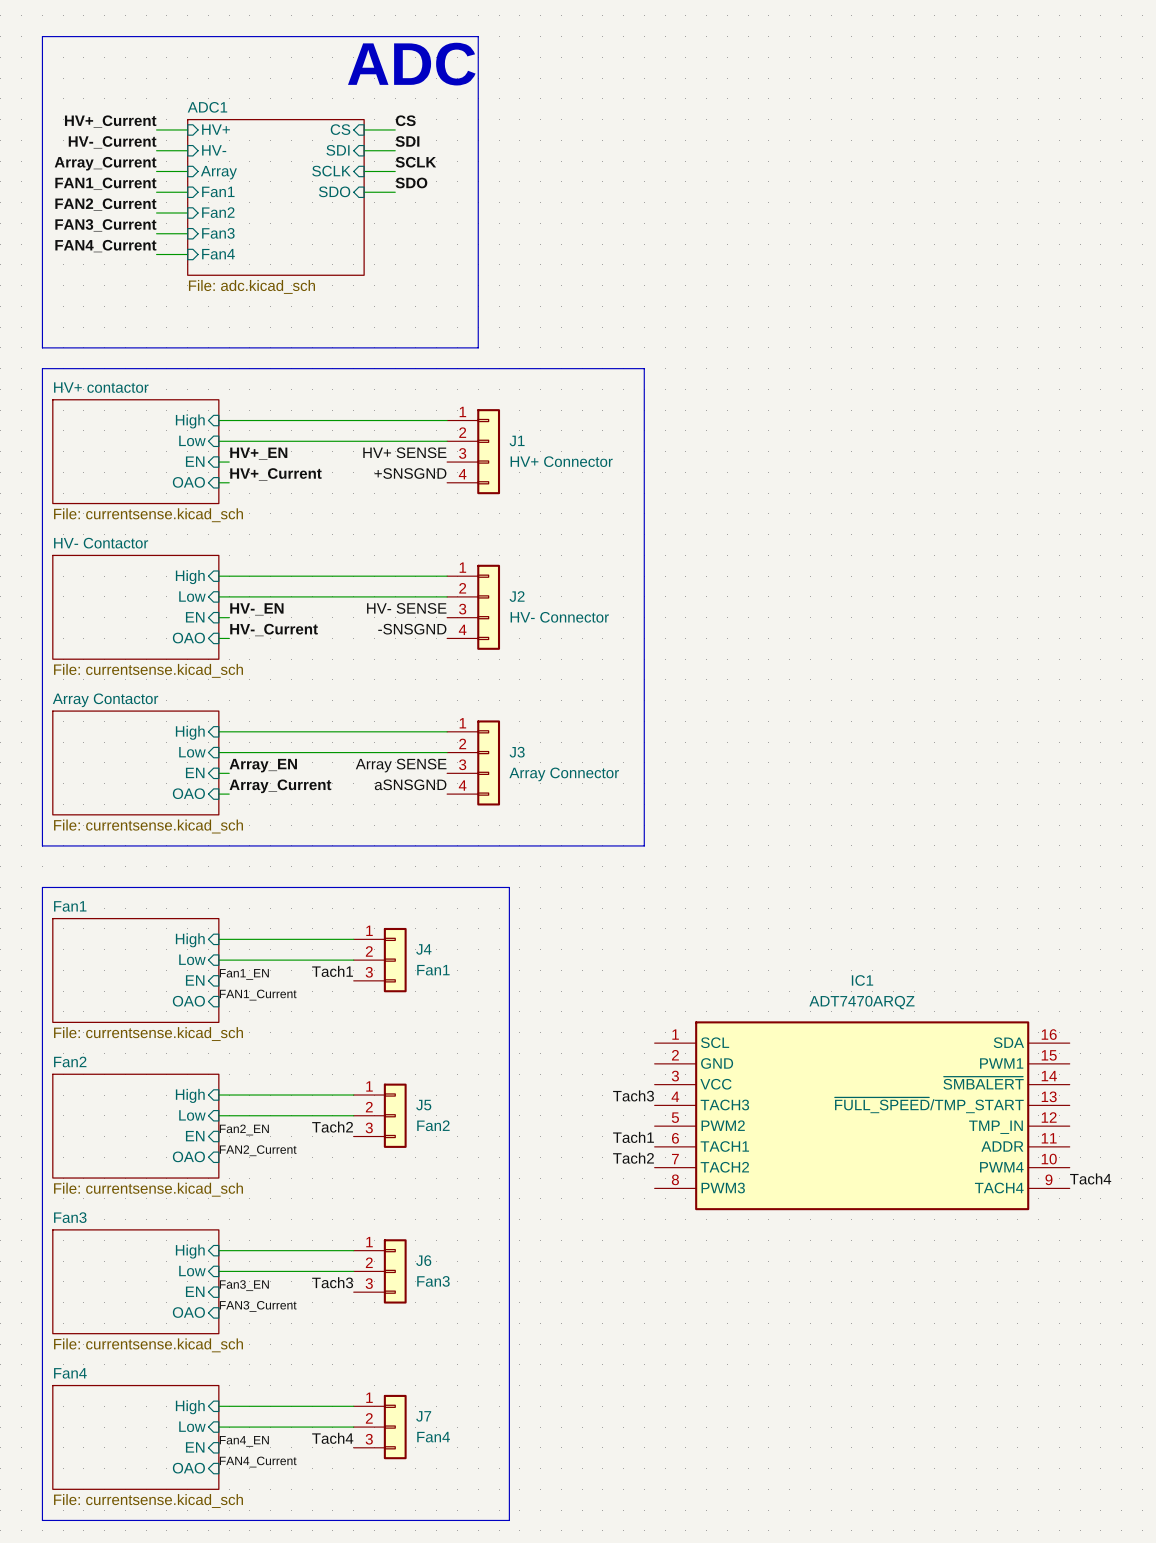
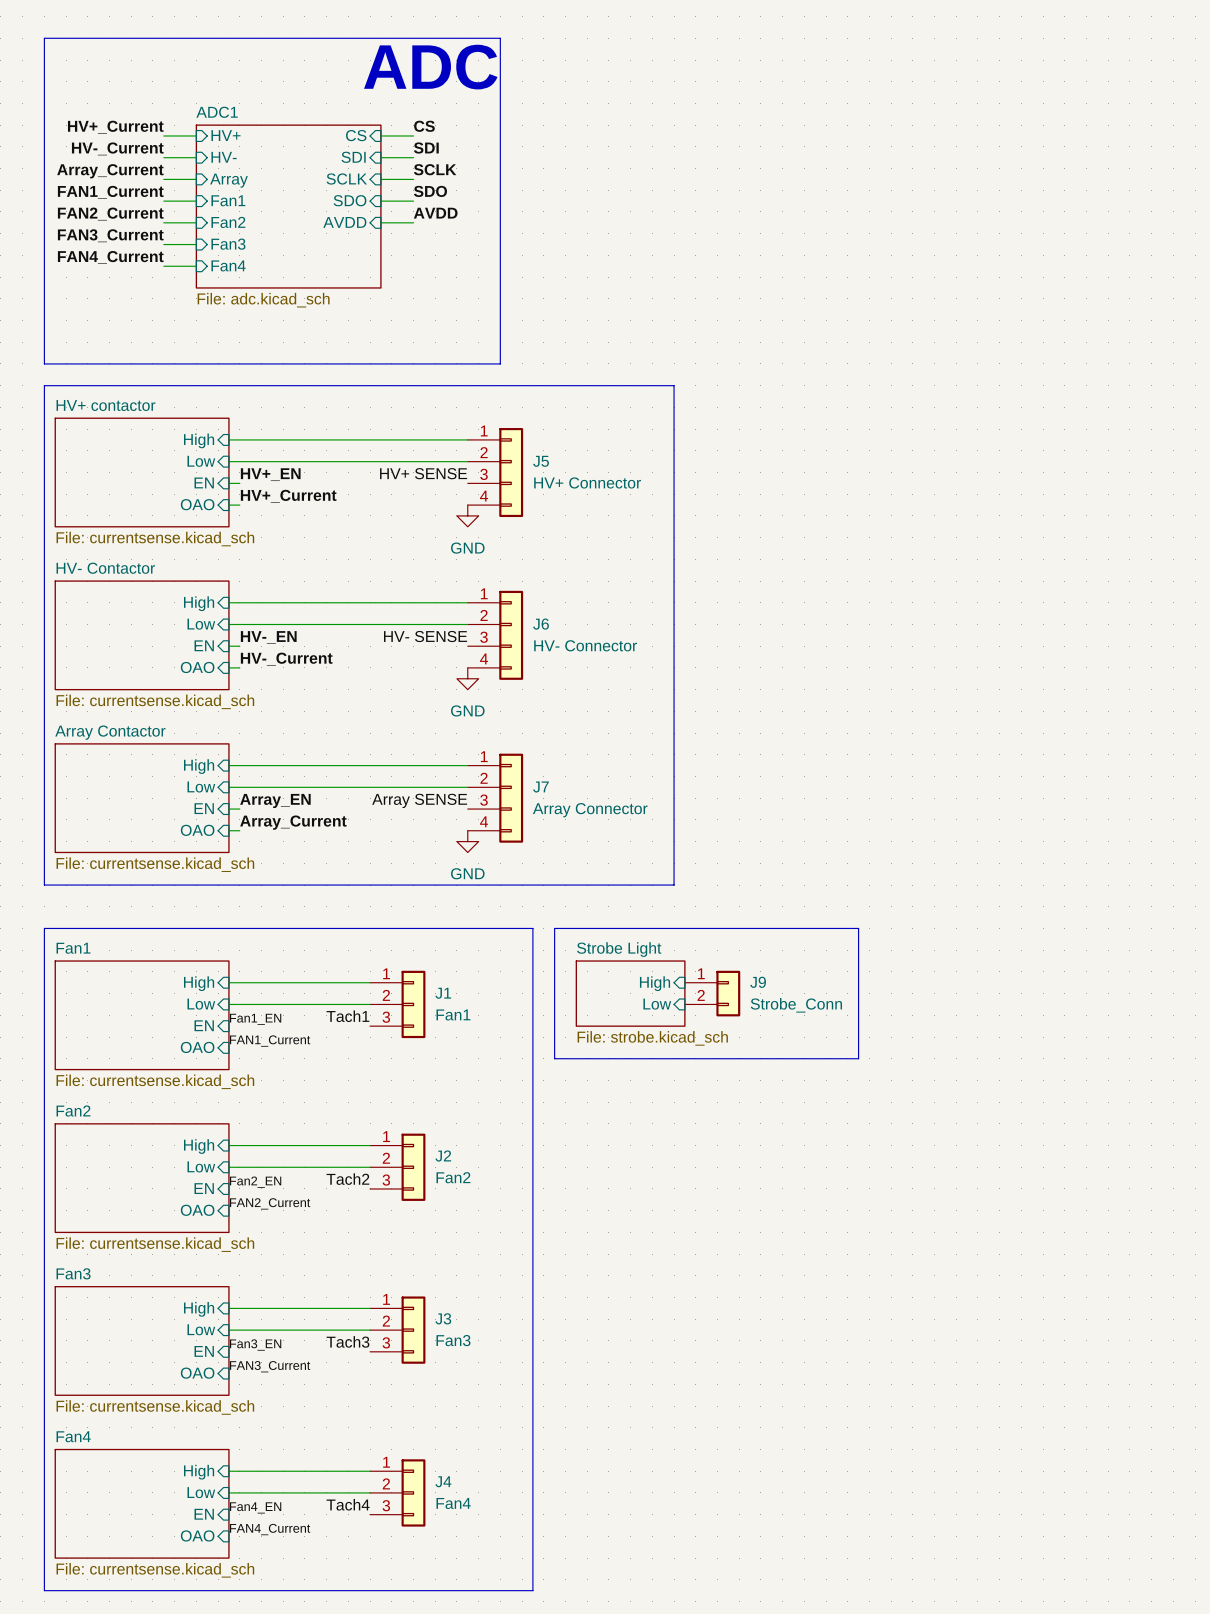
label: none -> AVDD (435, 213)
sheet pin: none -> AVDD (344, 222)
wire: none -> (380, 222) (413, 222)
J1 name: J1 (517, 440) -> J5 (541, 461)
label: +SNSGND (410, 473) -> none
power symbol: none -> GND (467, 515)
J2 name: J2 (517, 596) -> J6 (541, 624)
label: -SNSGND (412, 629) -> none
power symbol: none -> GND (467, 678)
J3 name: J3 (517, 752) -> J7 (540, 787)
label: aSNSGND (410, 784) -> none
power symbol: none -> GND (467, 841)
line: none -> (554, 928) (858, 928) (858, 1058) (554, 1058) (554, 928)
sheet pin: none -> High (655, 983)
J4 name: J4 (423, 949) -> J1 (443, 993)
sheet Strobe Light: none -> File: strobe.kicad_sch (630, 993)
J9: none -> Strobe_Conn (712, 993)
sheet pin: none -> Low (657, 1004)
label: Tach3 (633, 1095) -> none
J5 name: J5 (423, 1105) -> J2 (443, 1156)
IC1: ADT7470ARQZ (862, 1115) -> none
label: Tach1 (633, 1137) -> none
label: Tach2 (633, 1158) -> none
label: Tach4 (1090, 1178) -> none
J6 name: J6 (423, 1260) -> J3 (443, 1318)
J7 name: J7 (423, 1416) -> J4 (443, 1481)

